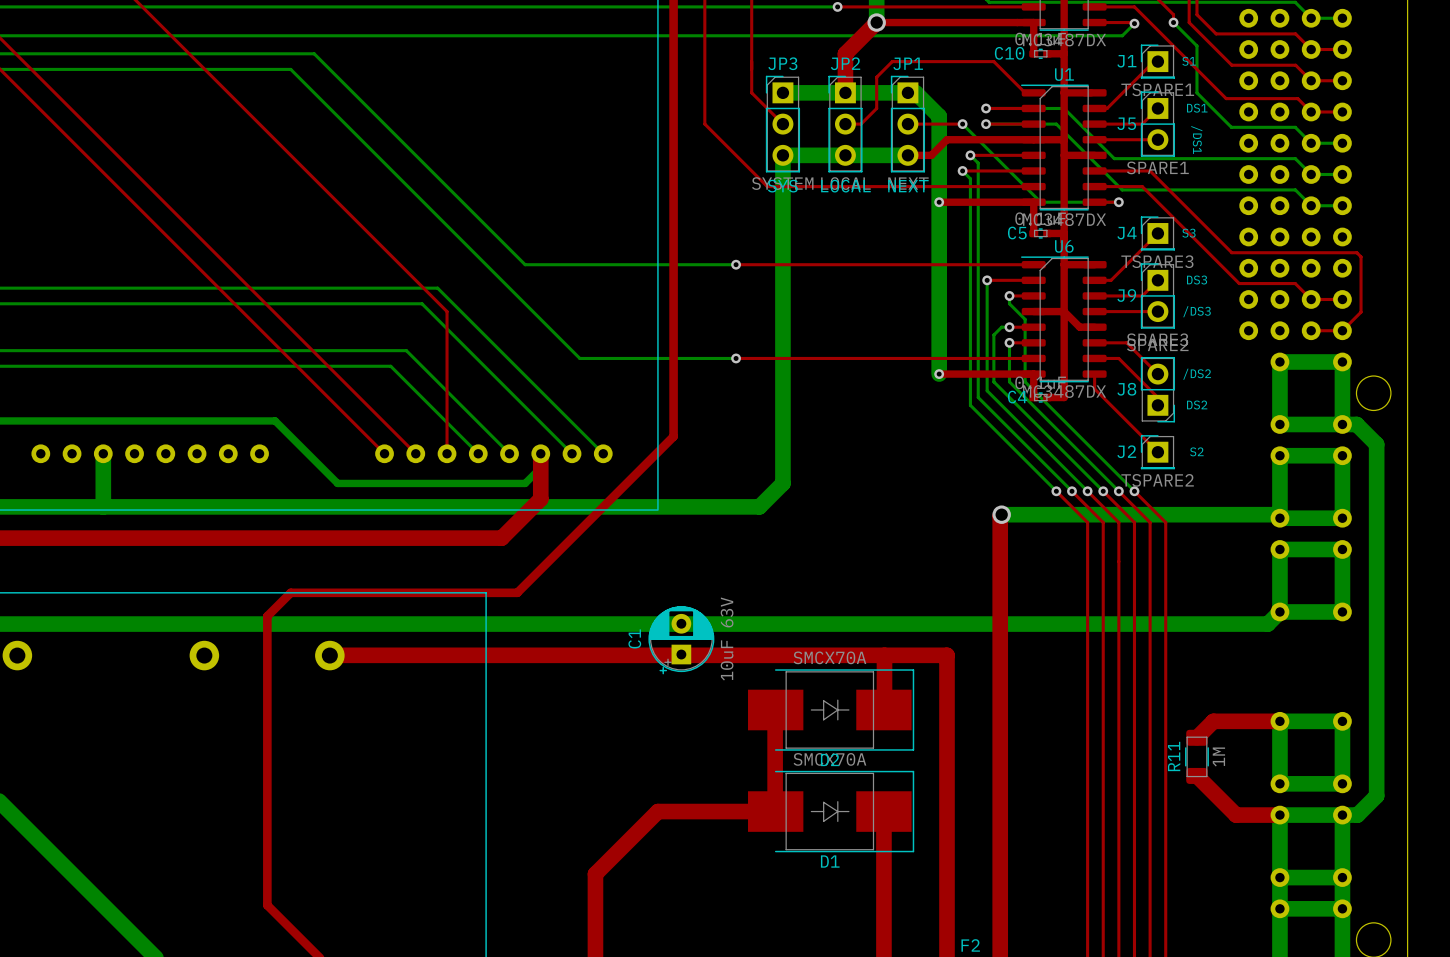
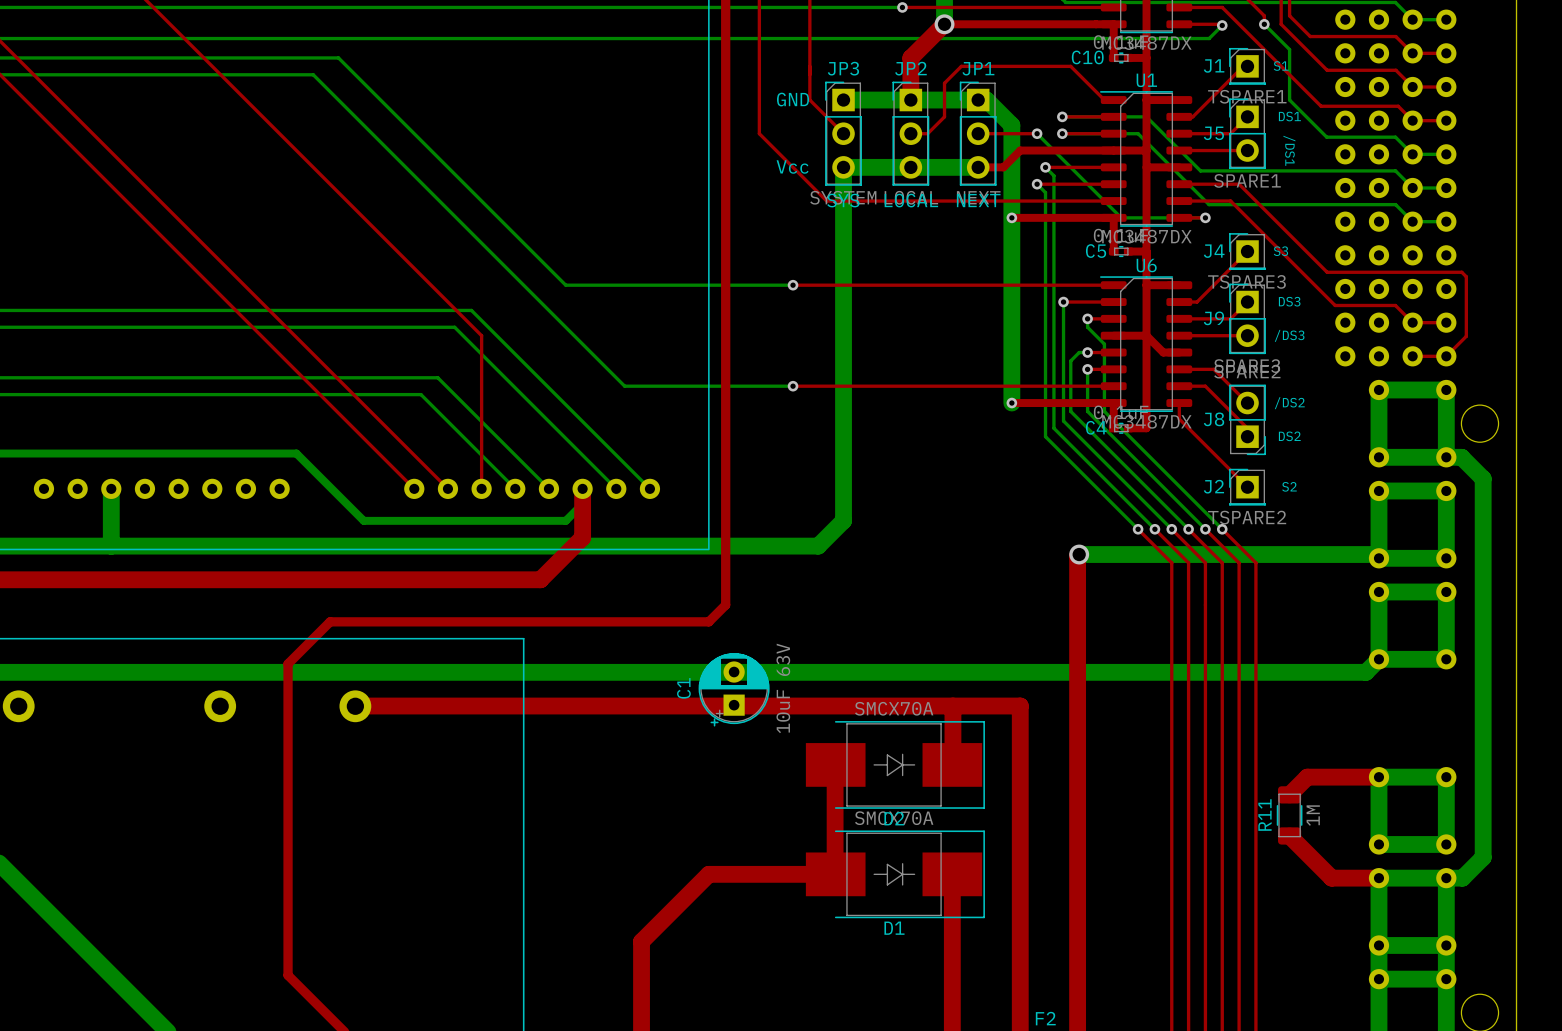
text: none -> GND (793, 99)
text: none -> Vcc (792, 166)
top track: (673, 436) (517, 592) (290, 592) -> (725, 470) (725, 605) (708, 621) (330, 621) (313, 638)

